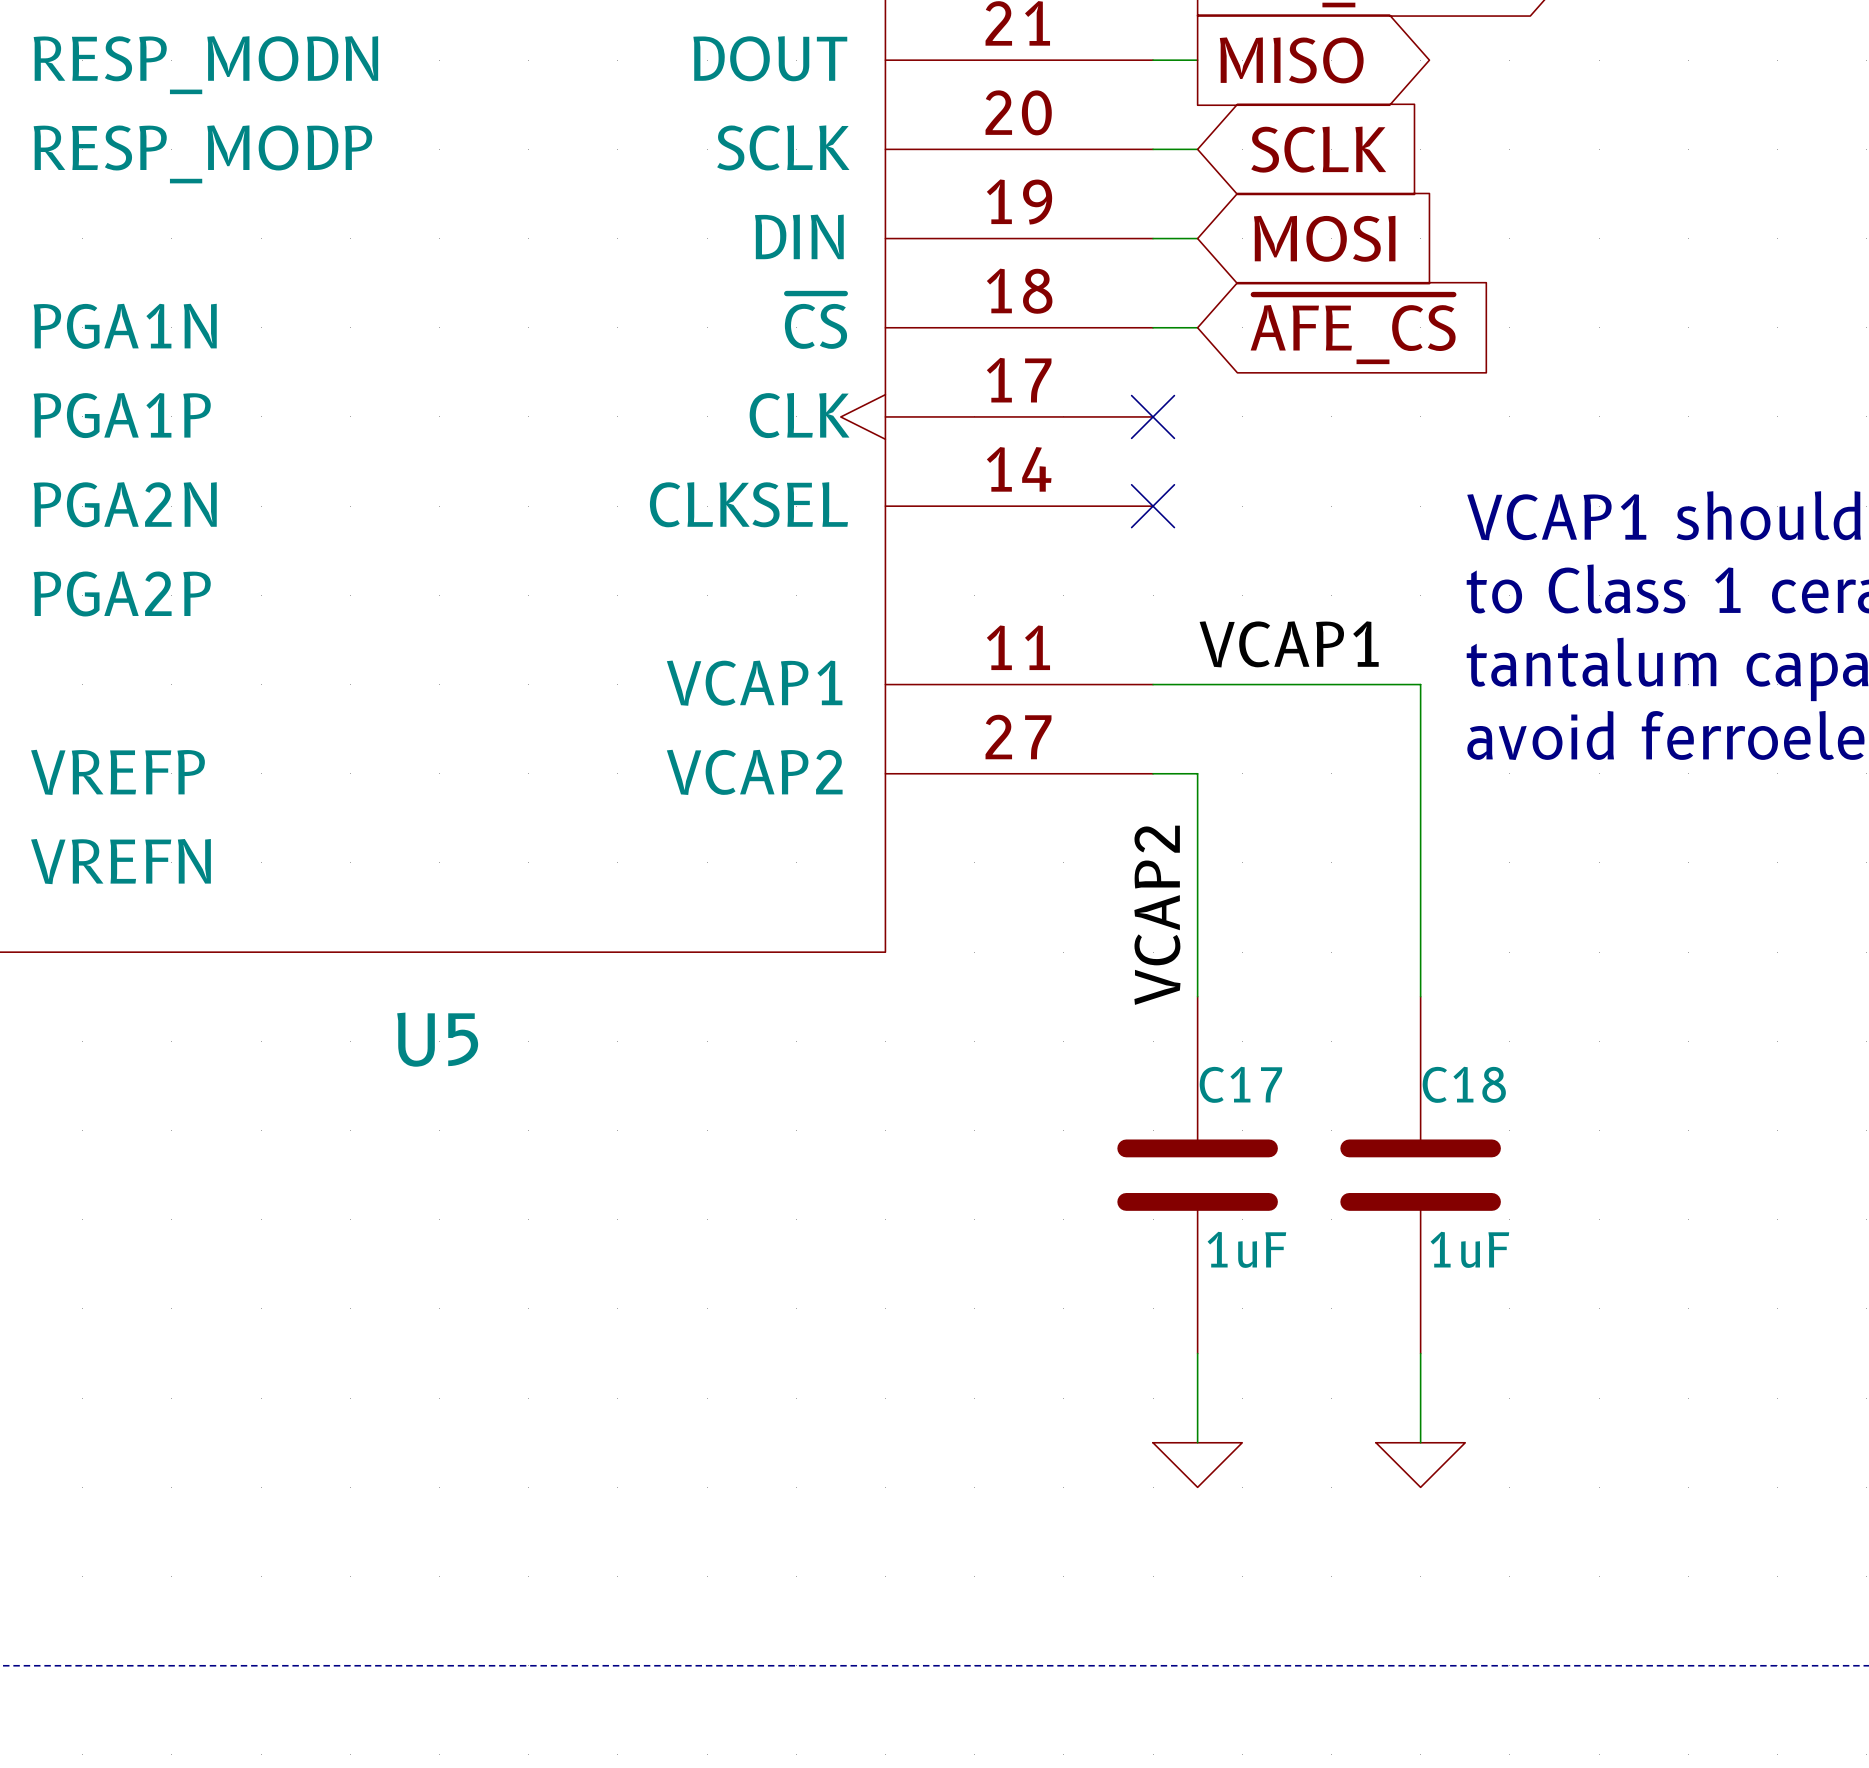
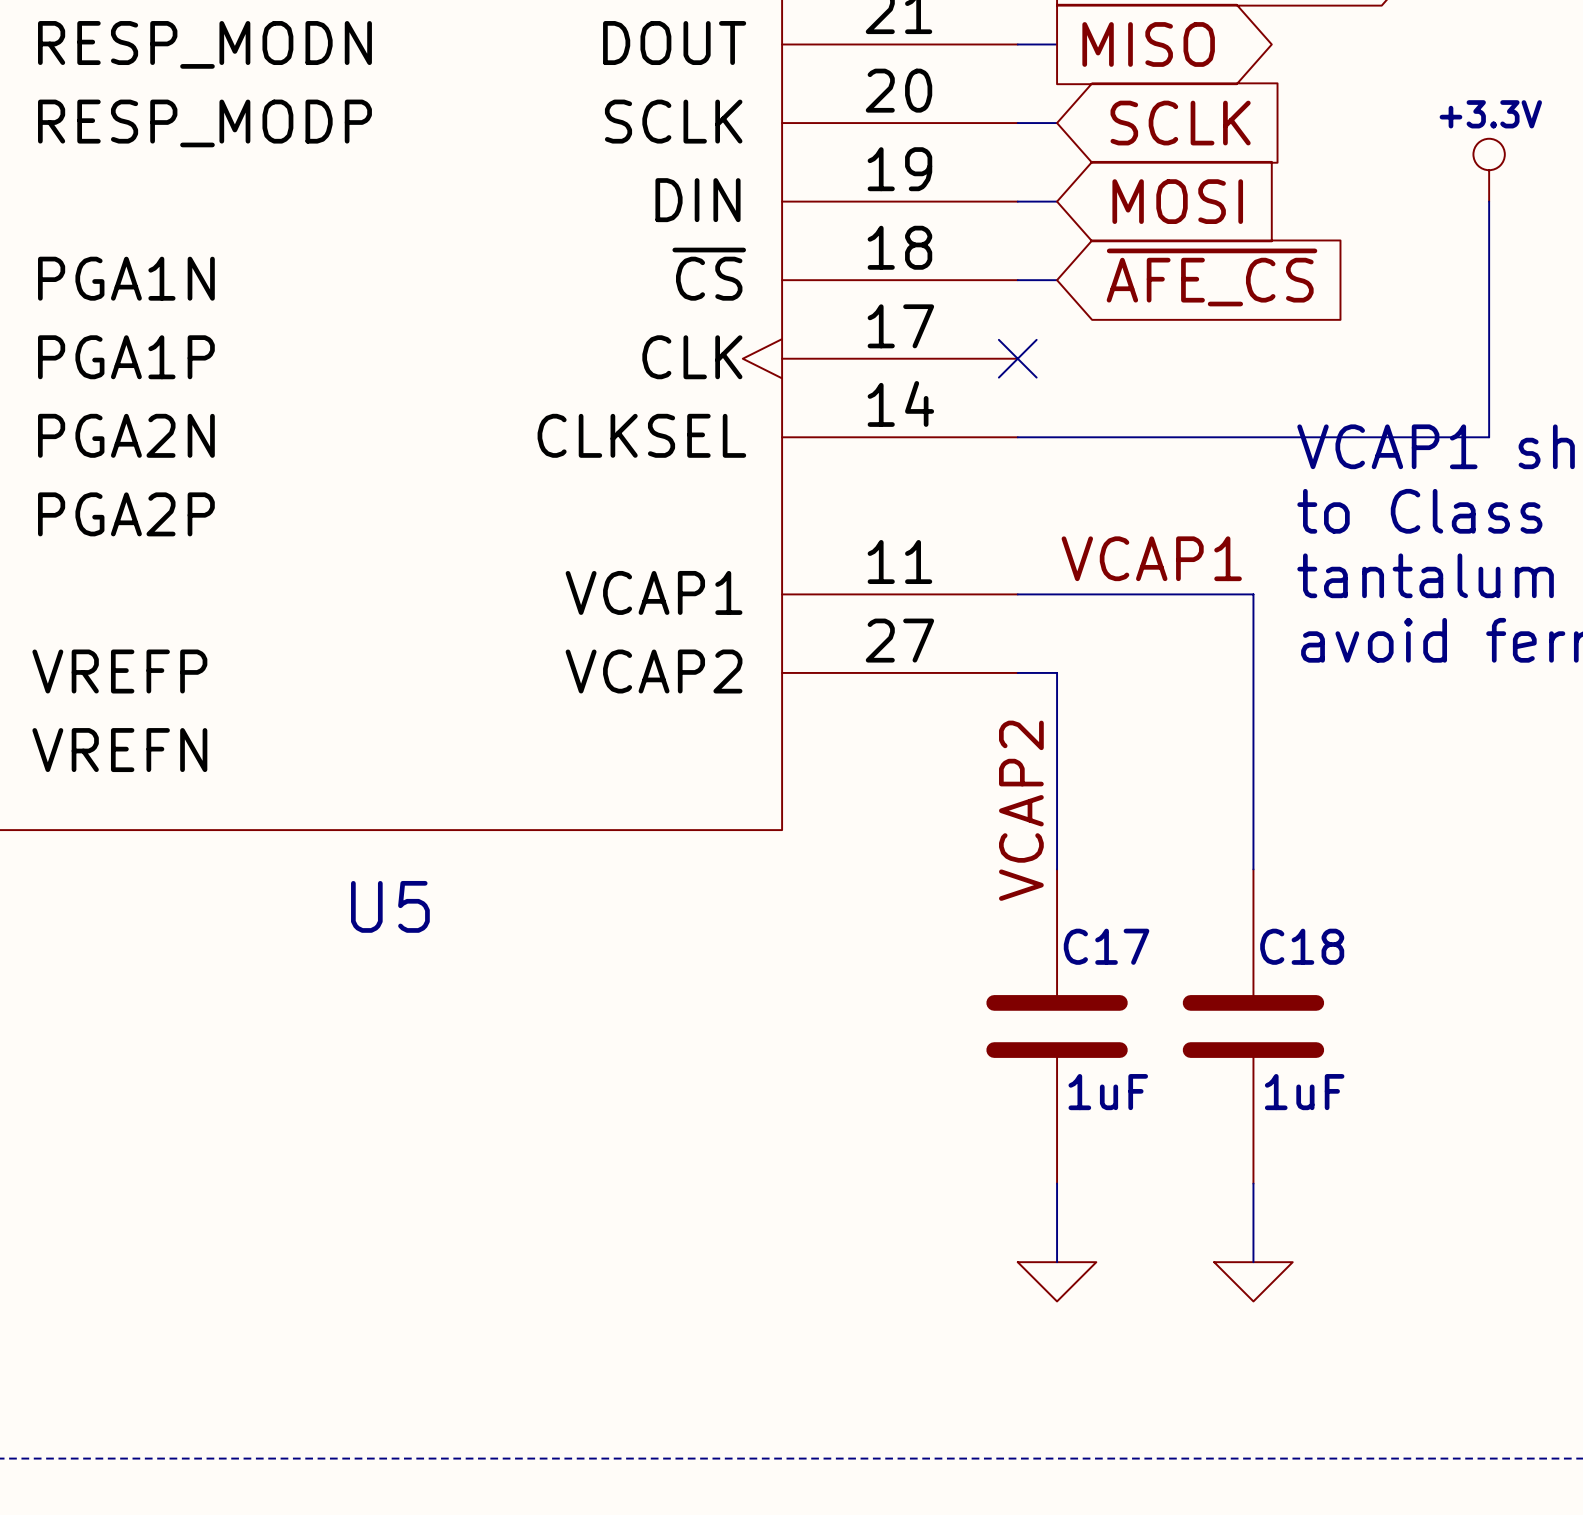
power symbol: none -> +3.3V (1489, 170)
wire: none -> (1489, 201) (1489, 437) (1017, 437)
no-connect mark: (1153, 506) -> none

